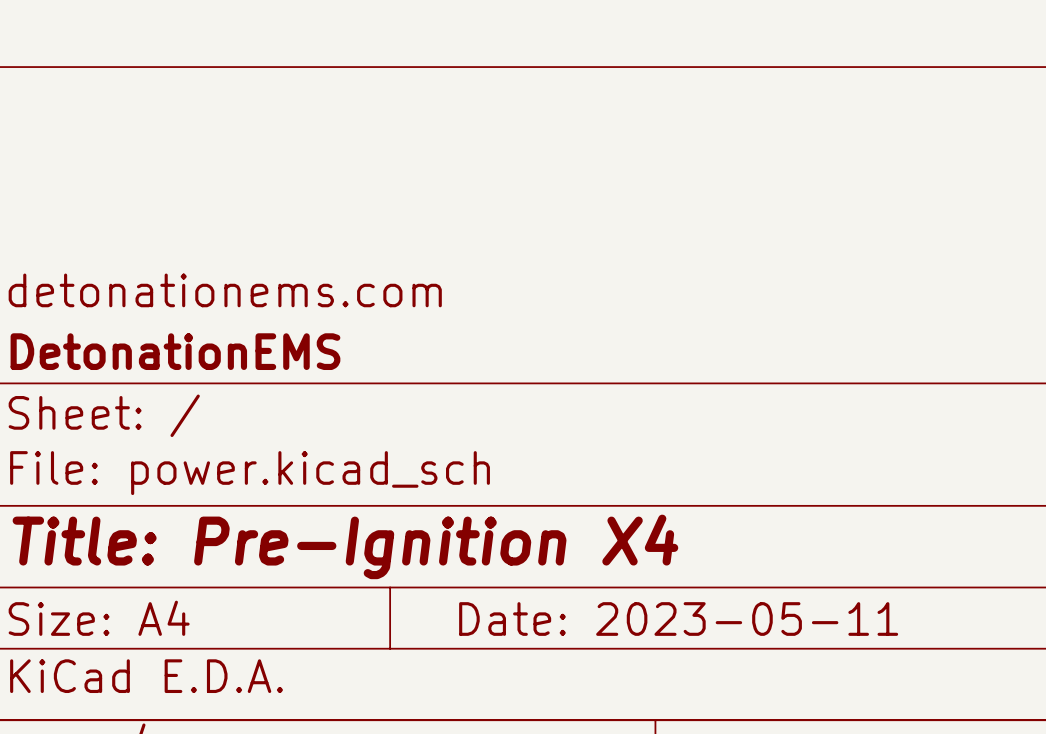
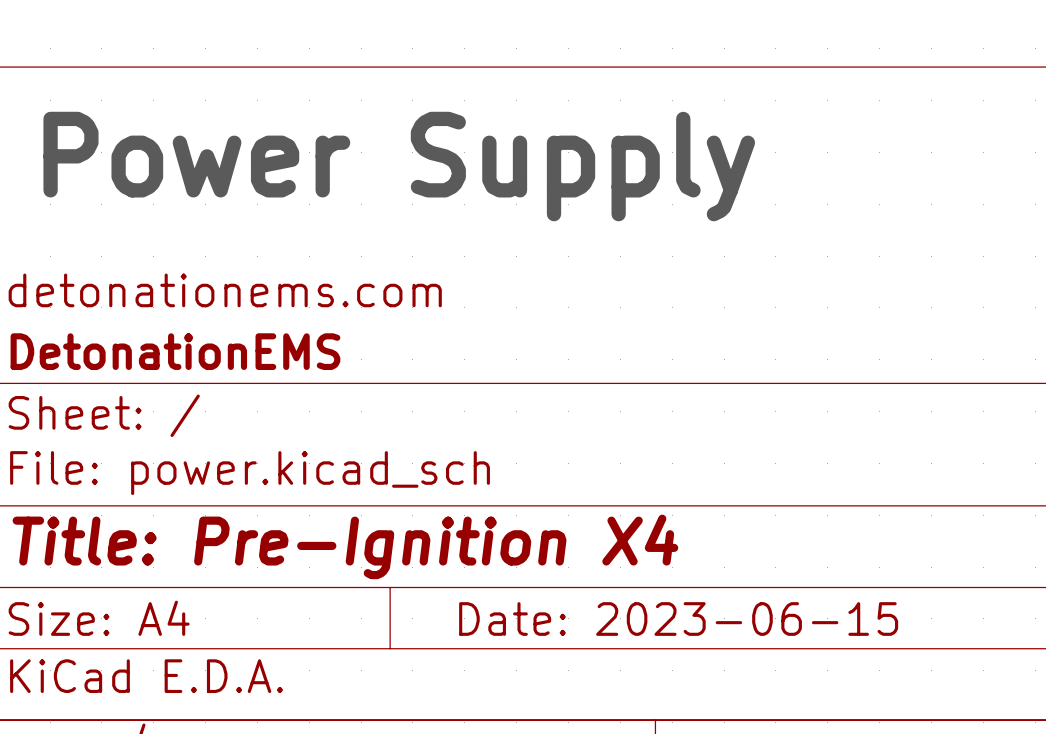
text: none -> Power Supply (399, 166)
title block: Date: 2023-05-11 (678, 619) -> Date: 2023-06-15 (678, 619)

